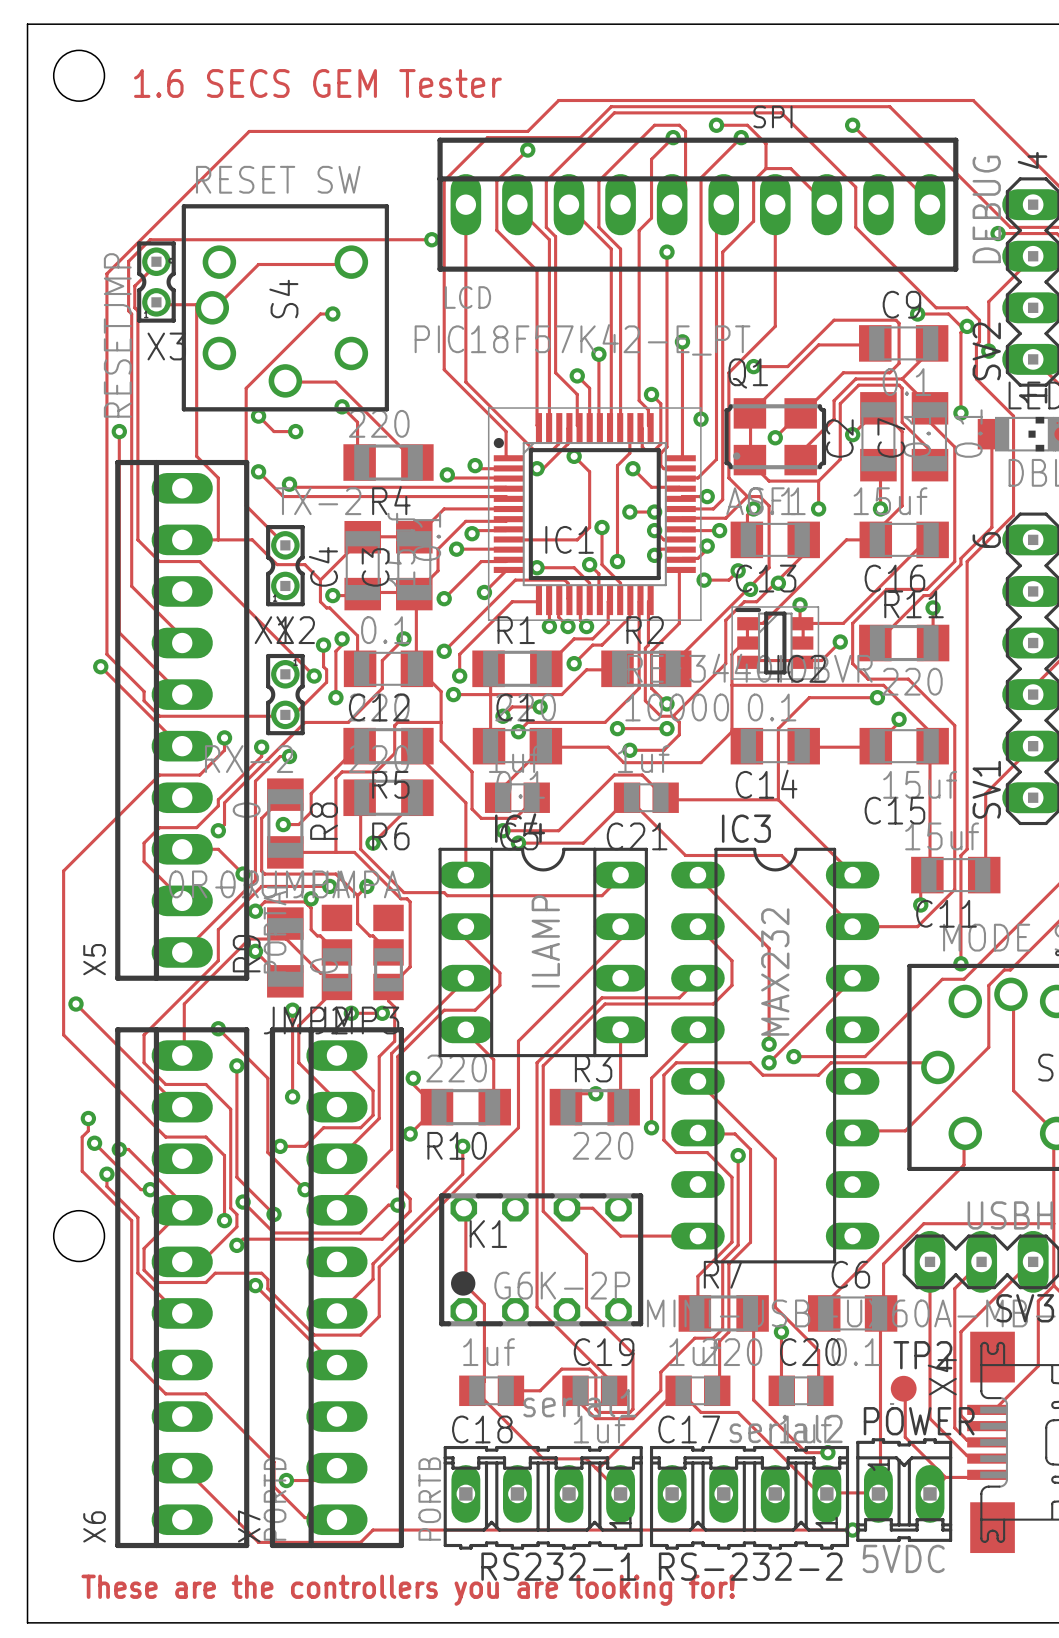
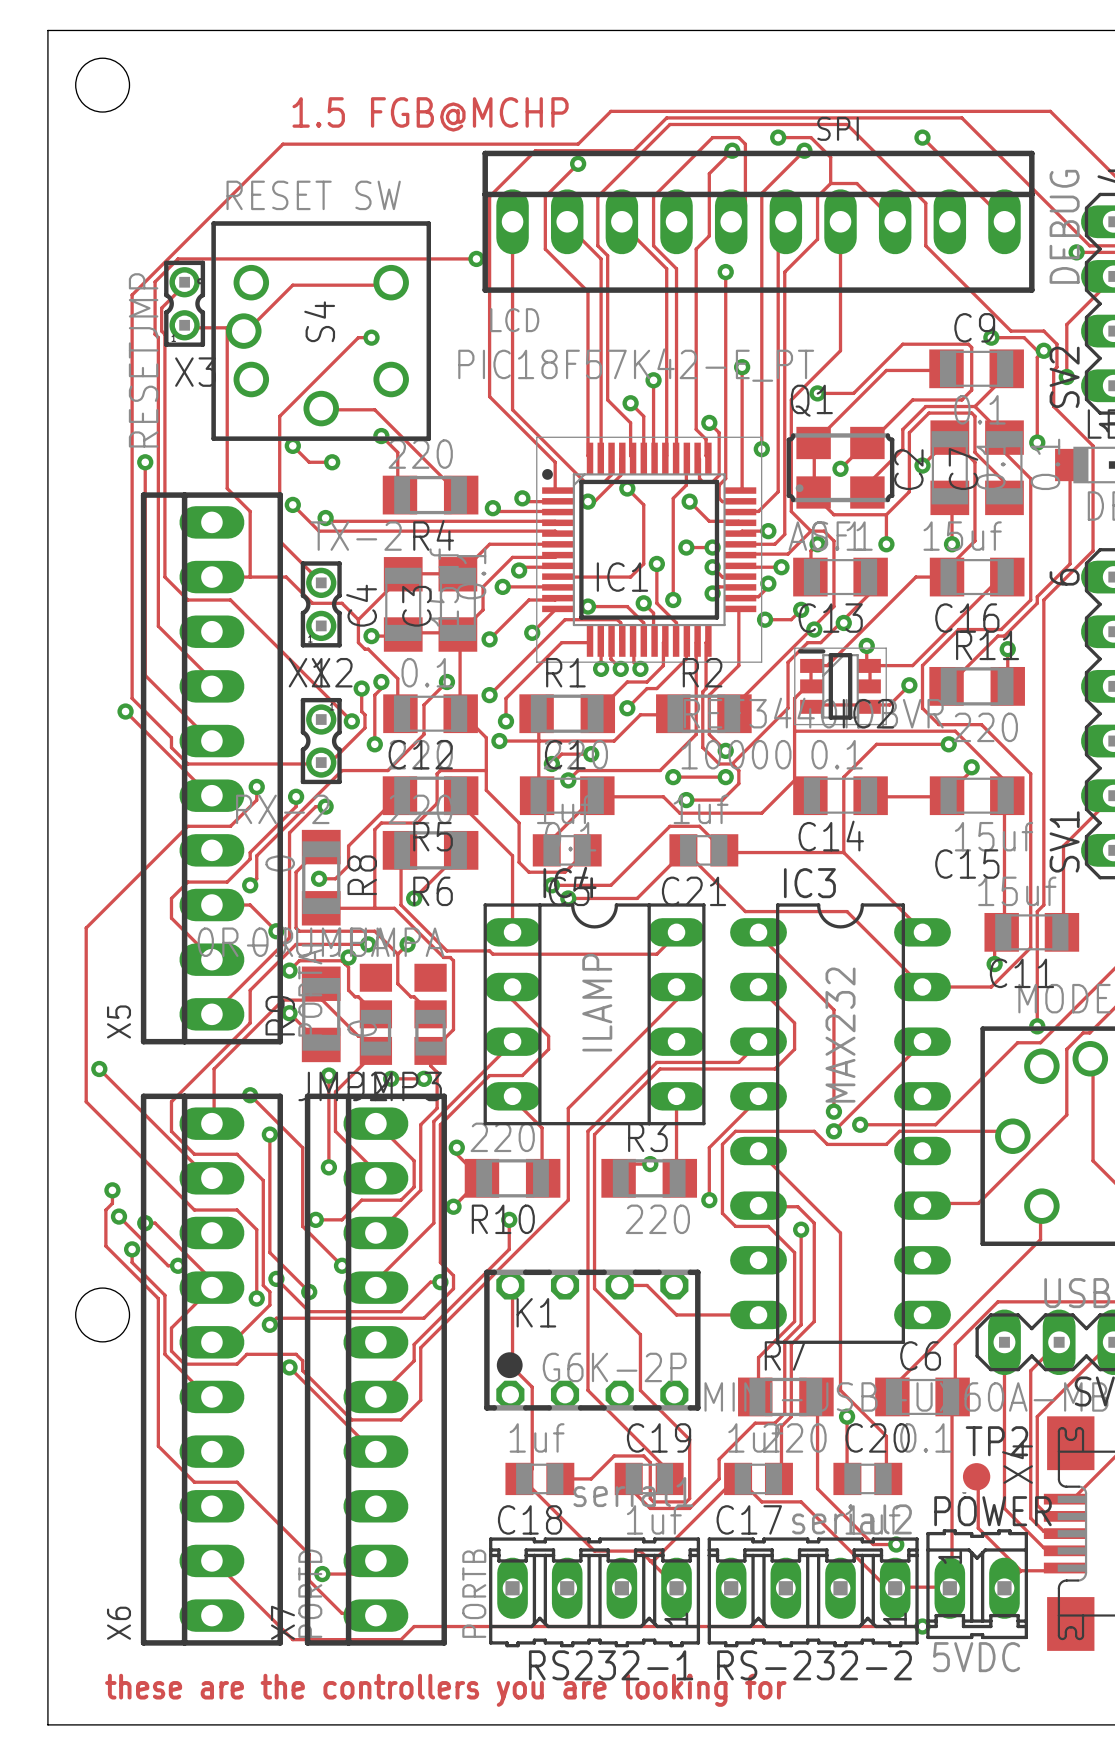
text: 1.6 SECS GEM Tester (317, 83) -> none
text: none -> 1.5 FGB@MCHP (430, 114)
text: These are the controllers you are looking for! (408, 1590) -> these are the controllers you are looking for (445, 1690)

